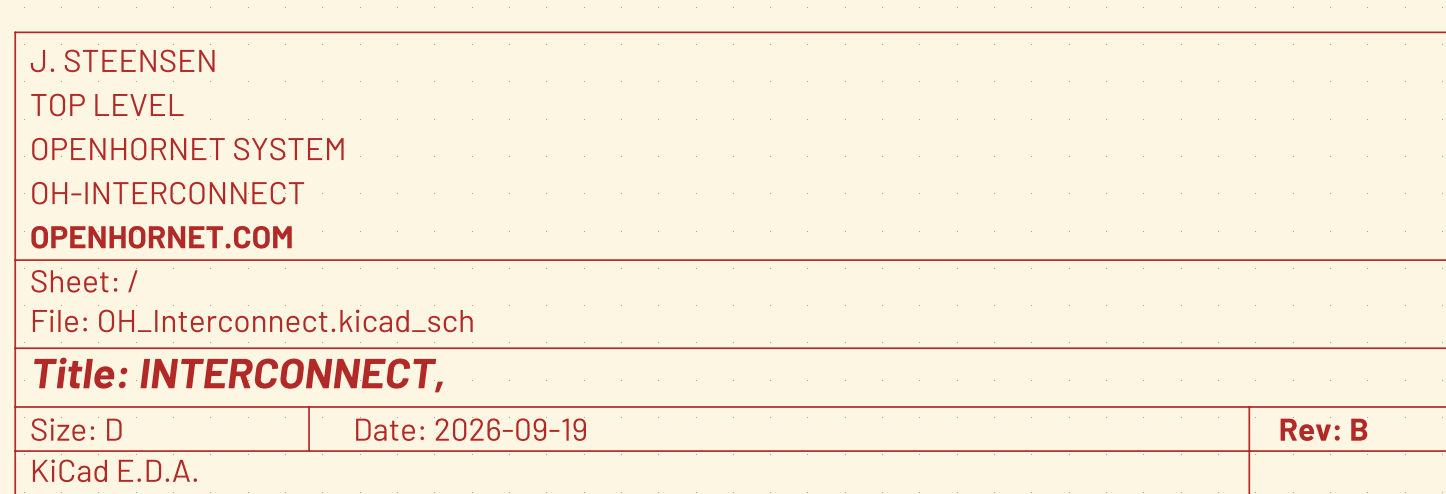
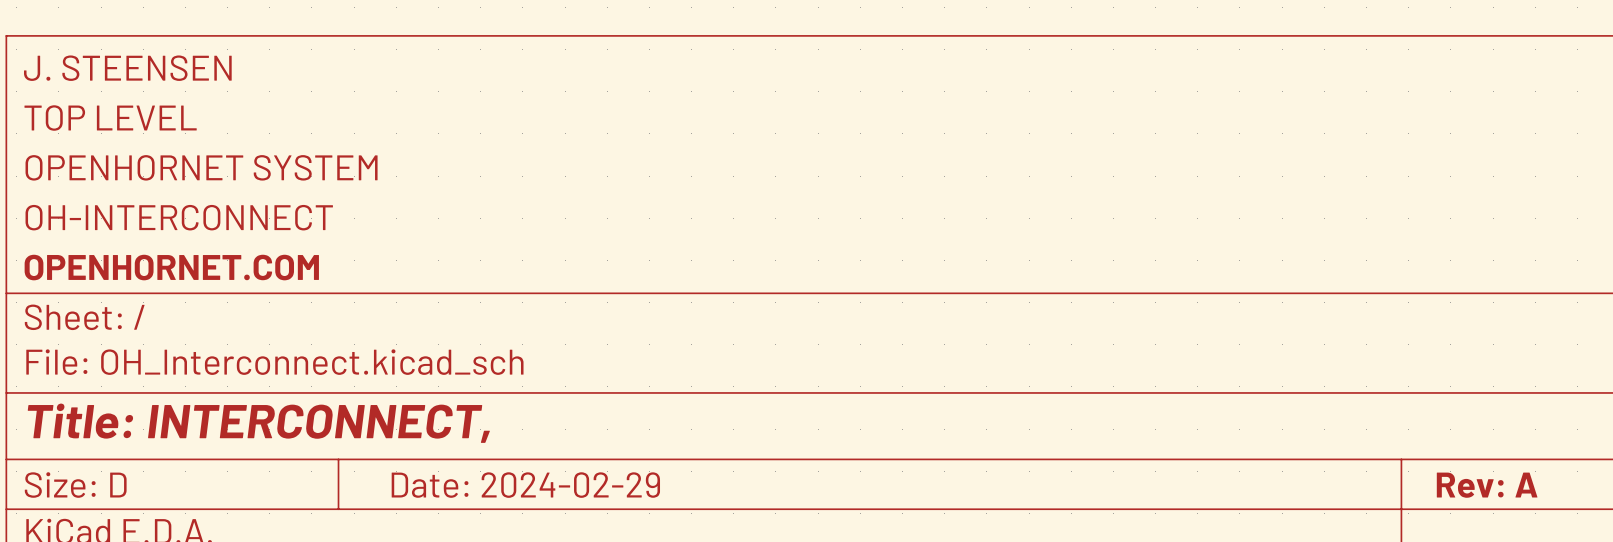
title block: Date: 2026-09-19 (471, 429) -> Date: 2024-02-29 (525, 485)
title block: Rev: B (1323, 429) -> Rev: A (1487, 485)

